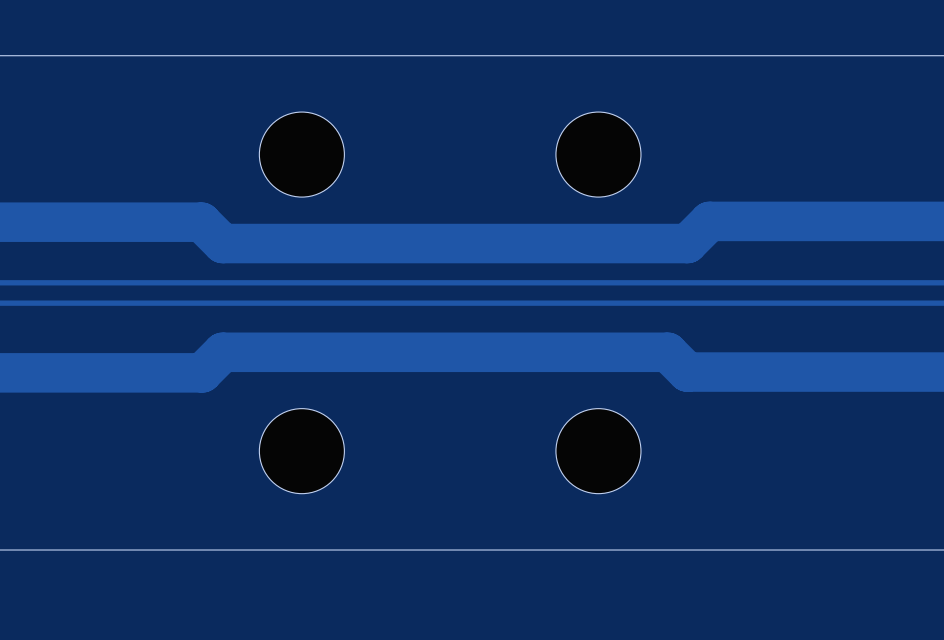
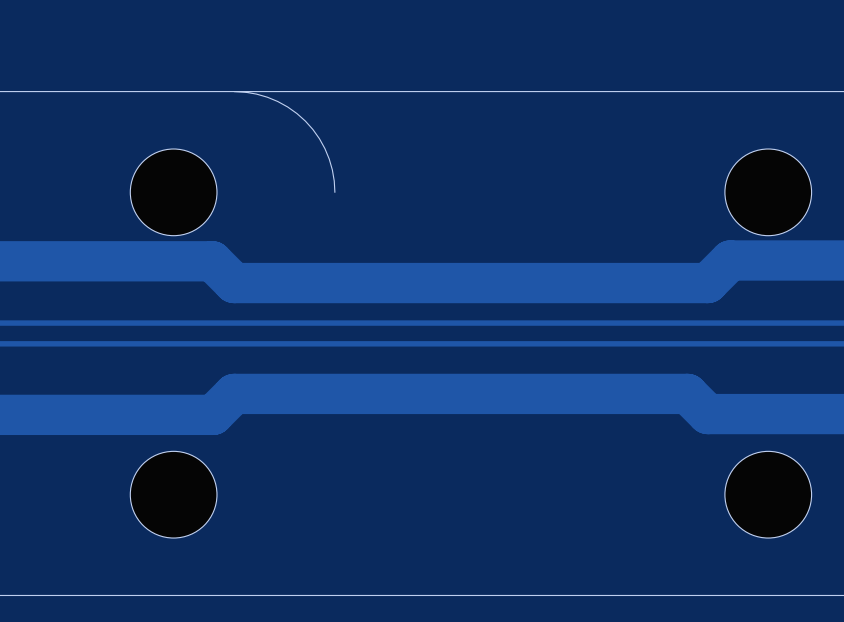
board edge: none -> (234, 91) (267, 97) (287, 107) (305, 121) (319, 138) (329, 159) (334, 192)
part position: (301, 154) -> (173, 192)
part position: (598, 154) -> (768, 192)
part position: (301, 451) -> (173, 494)
part position: (598, 451) -> (768, 494)

